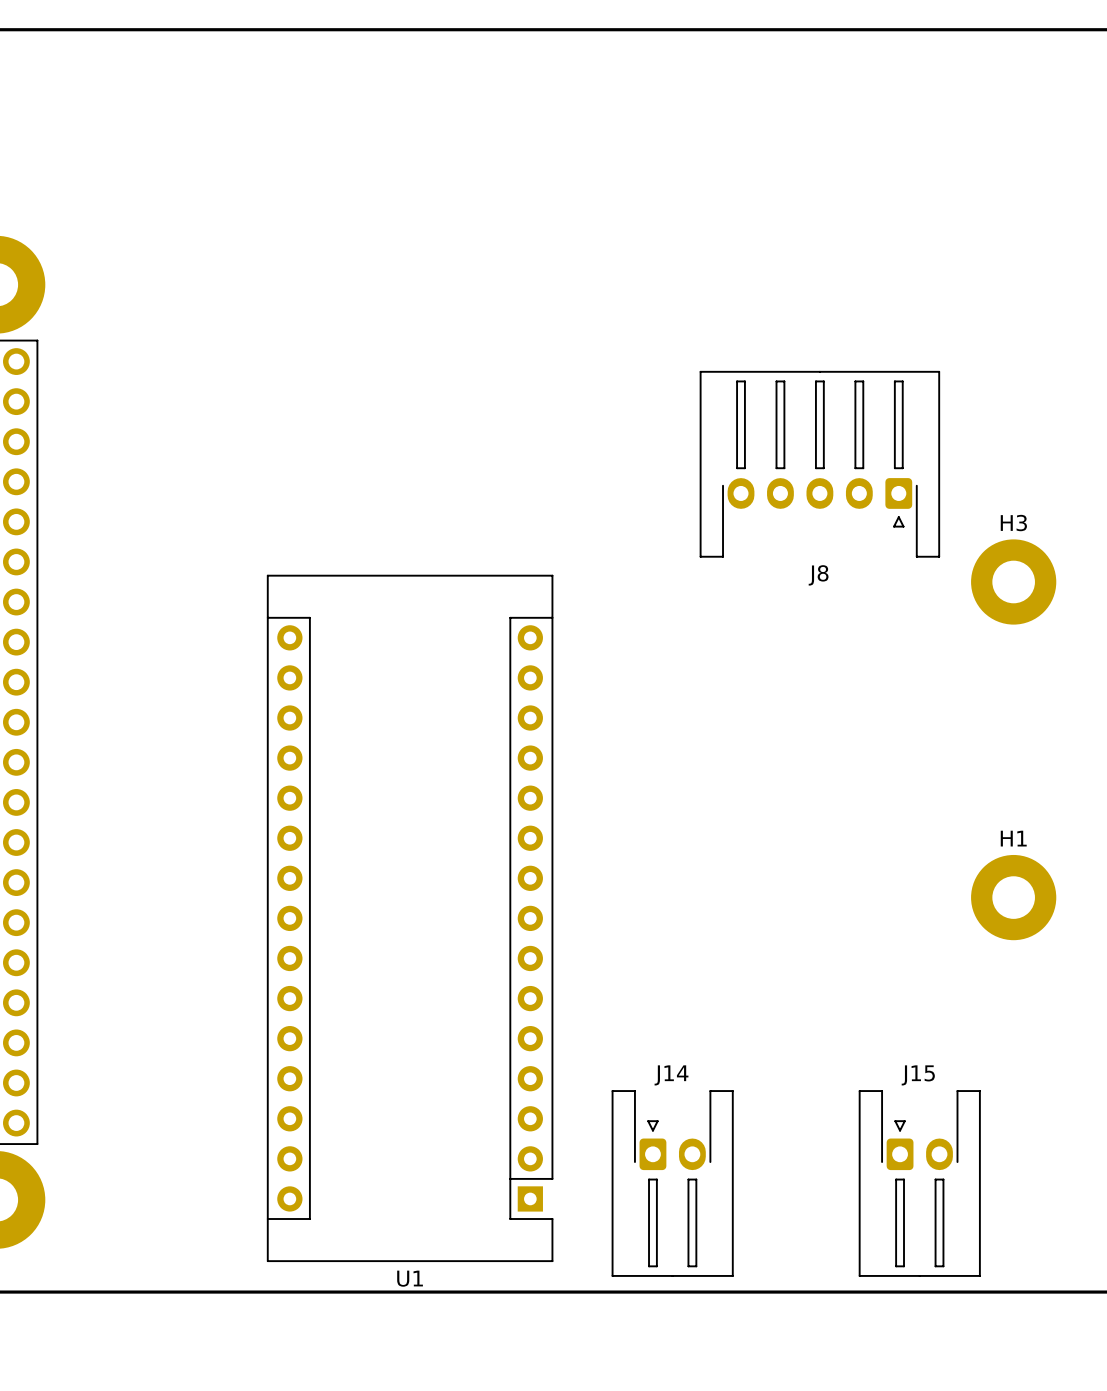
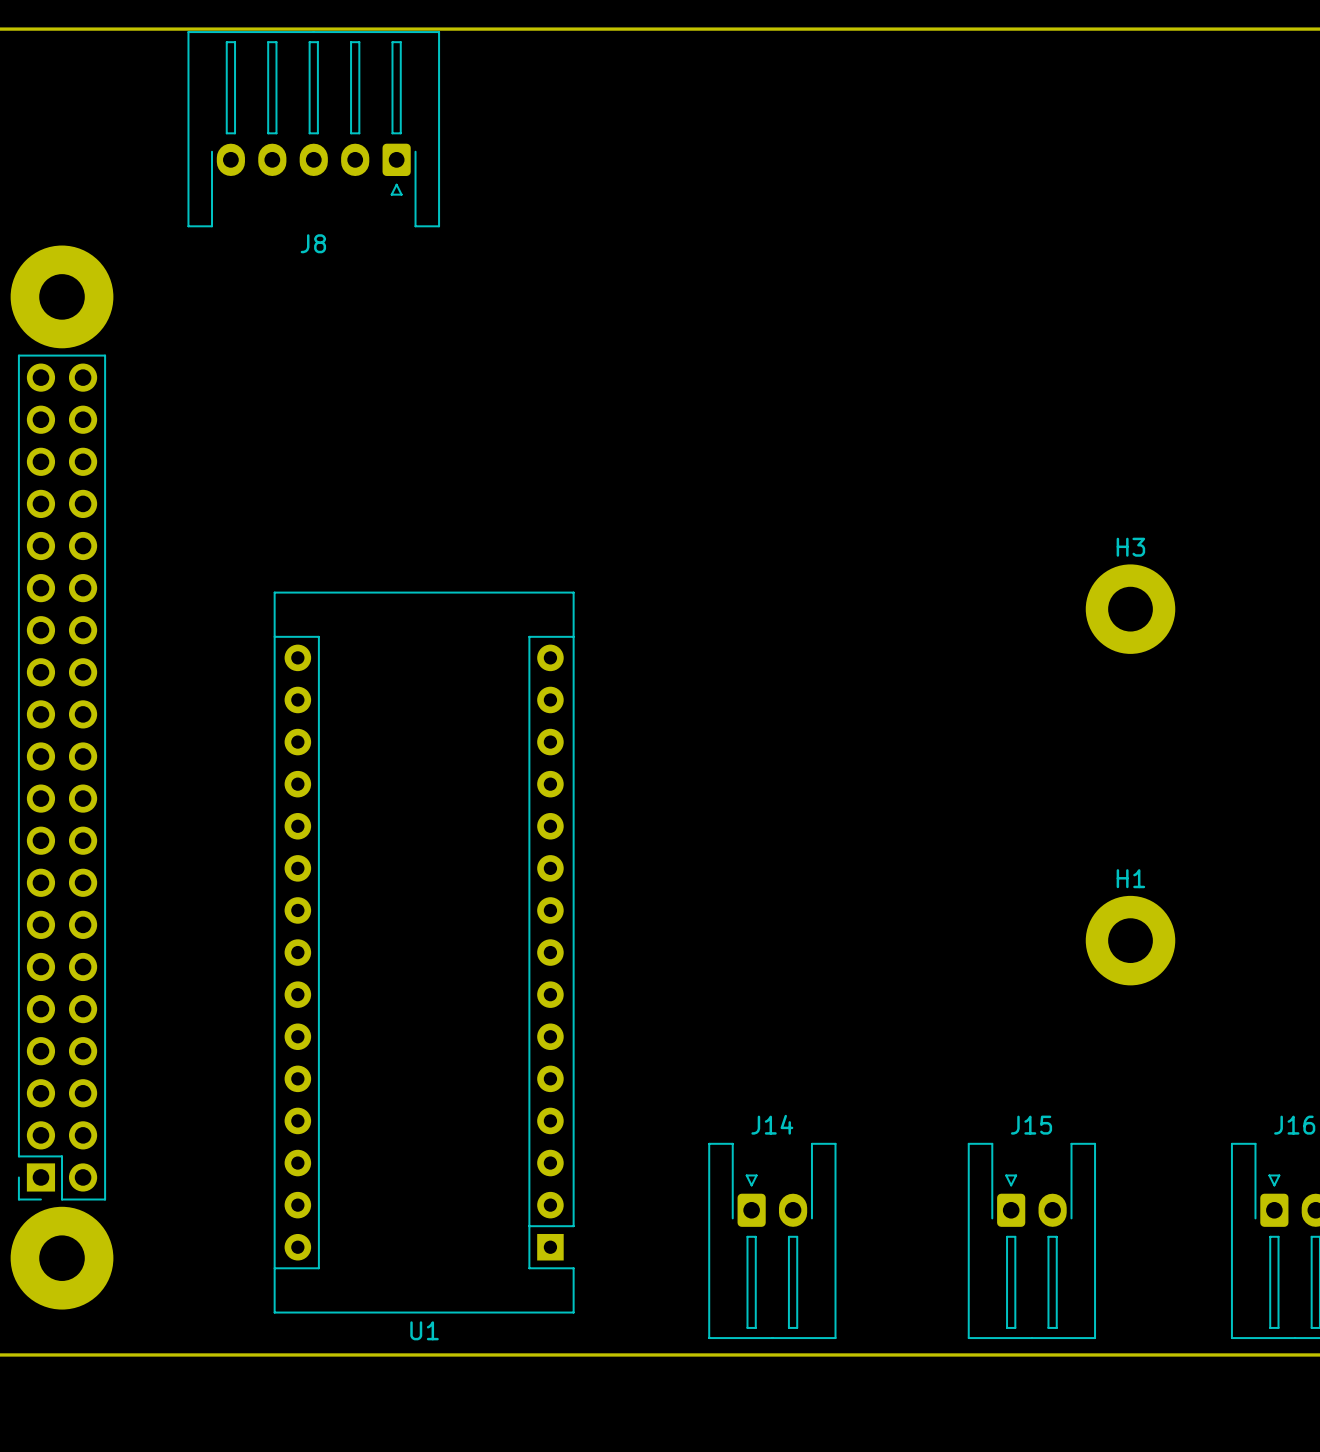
J8 position: (819, 464) -> (313, 129)
U1 position: (410, 918) -> (424, 952)

